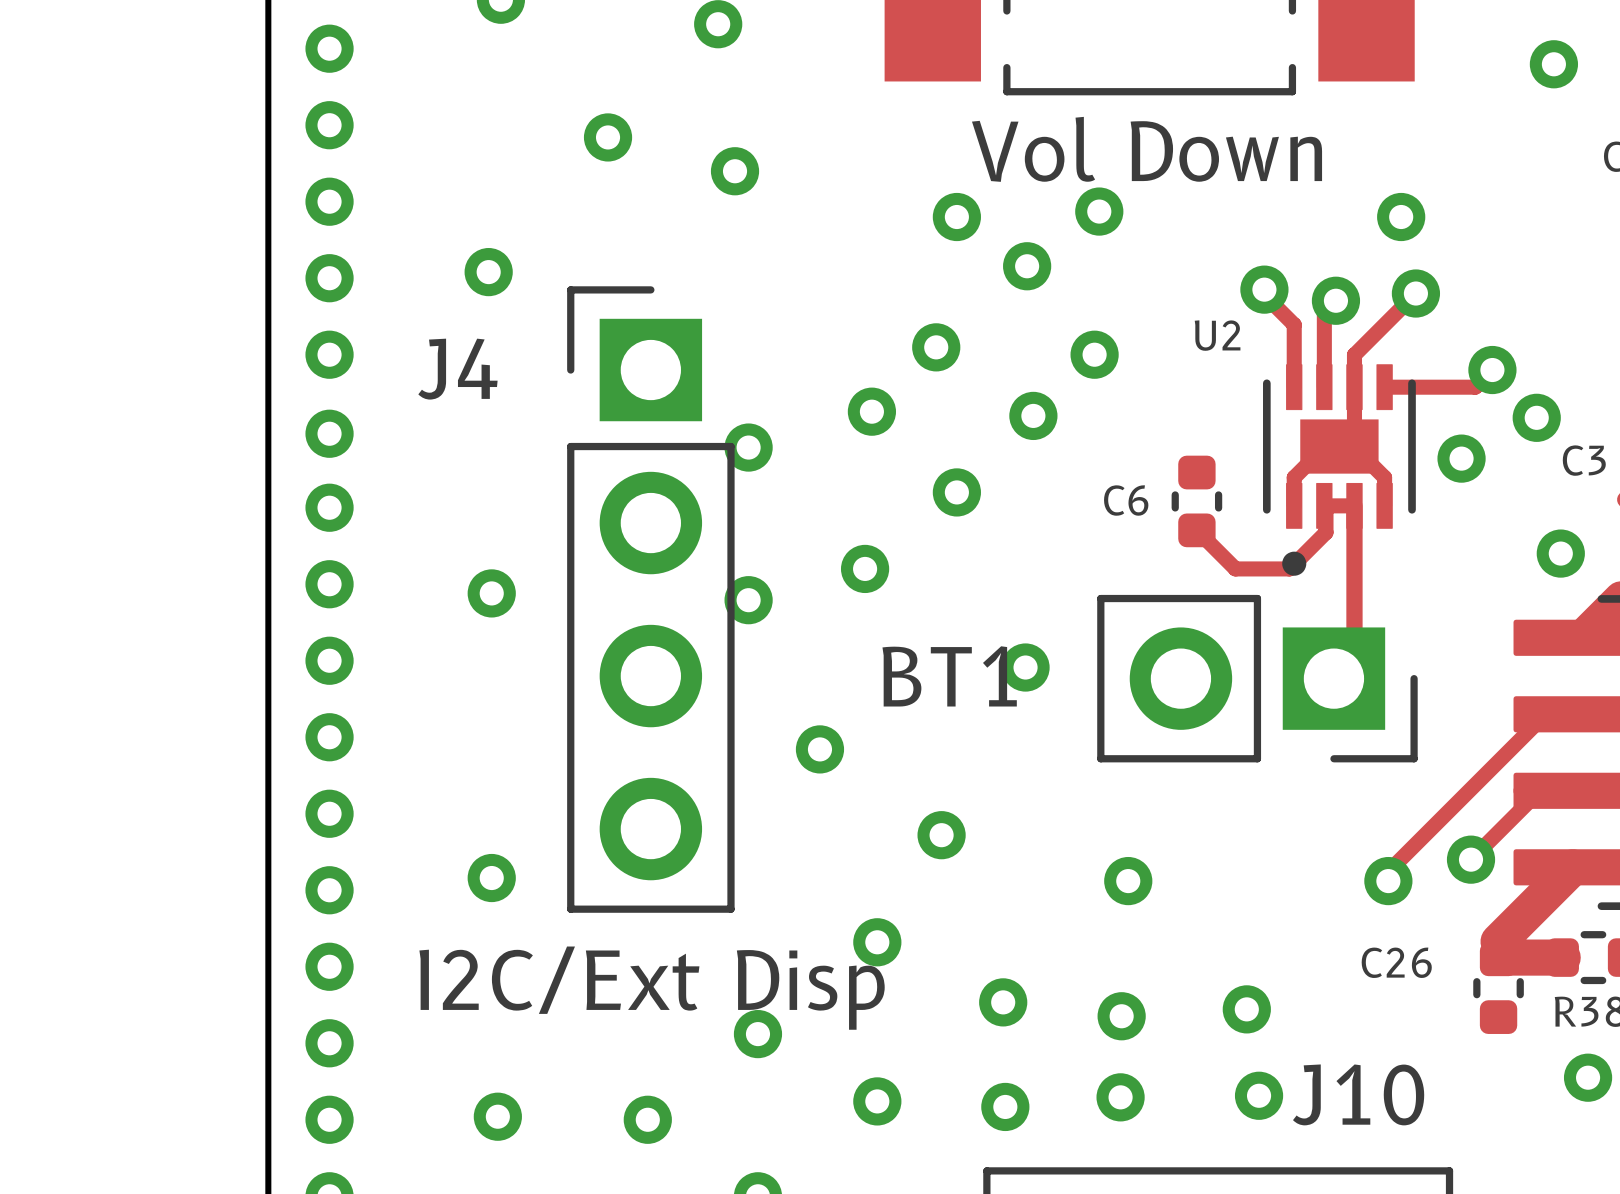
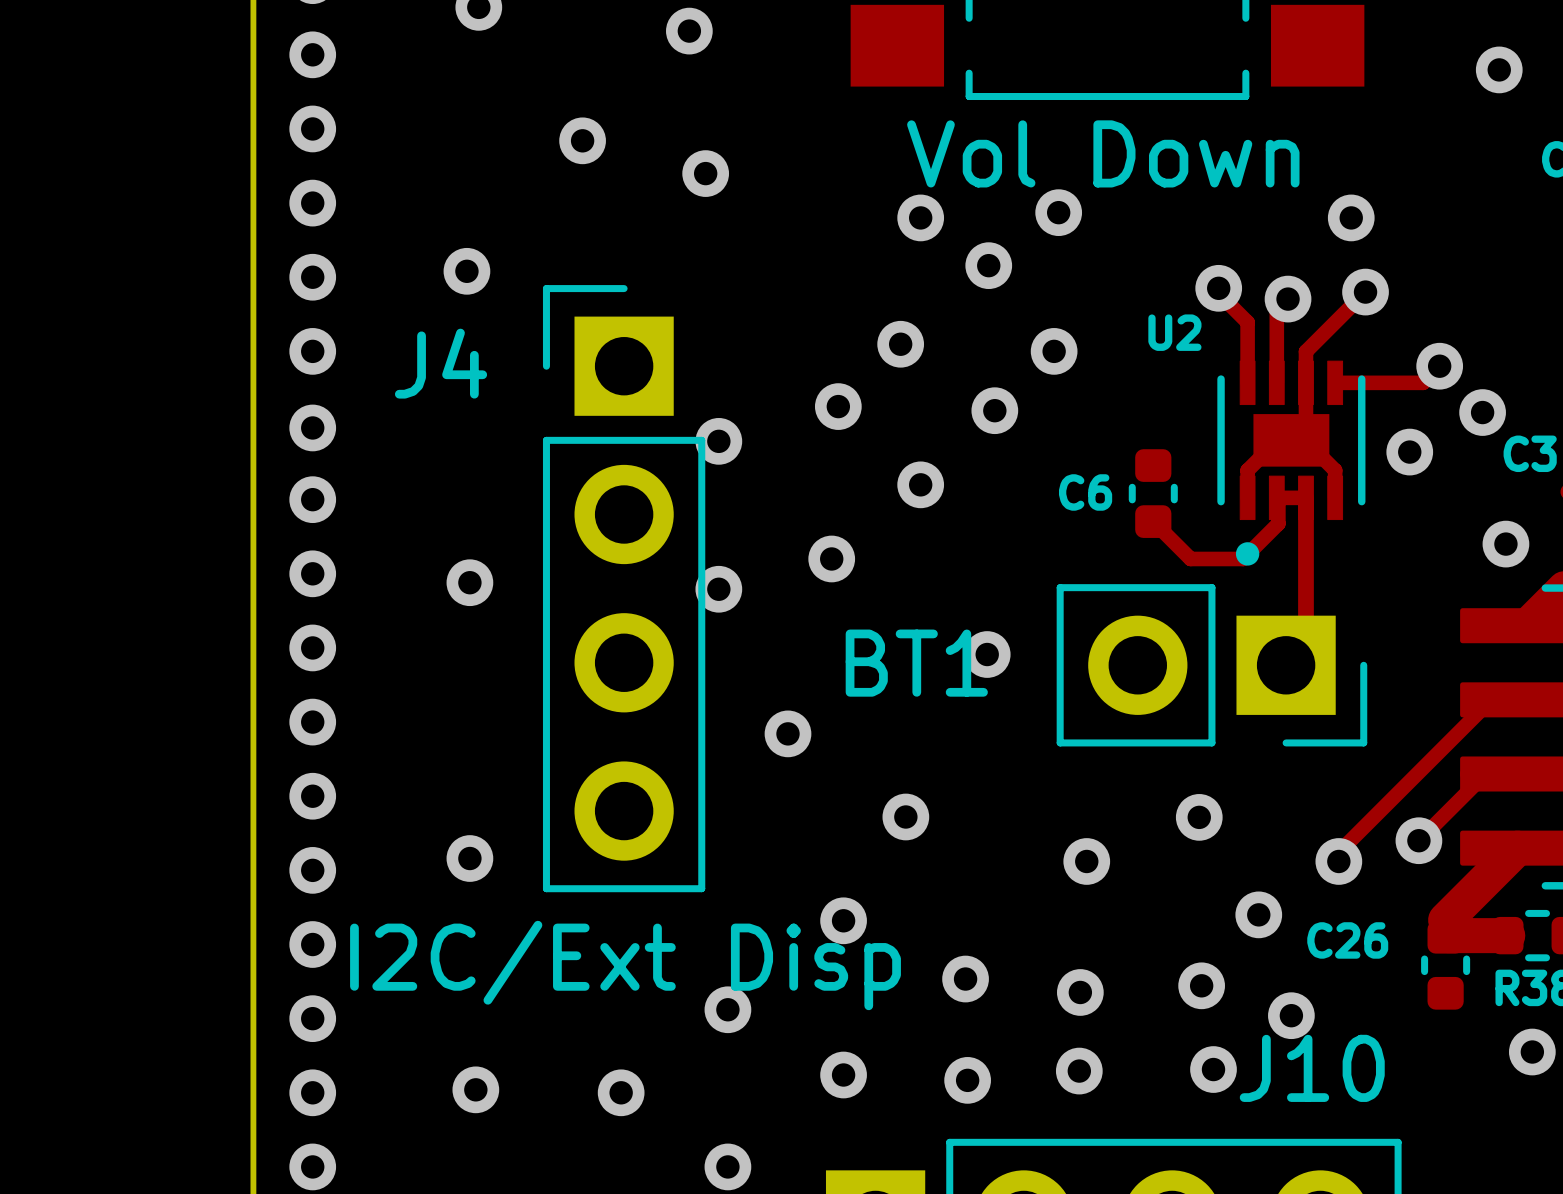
via: none -> (1199, 817)
via: none -> (1258, 914)
via: none -> (1291, 1015)

